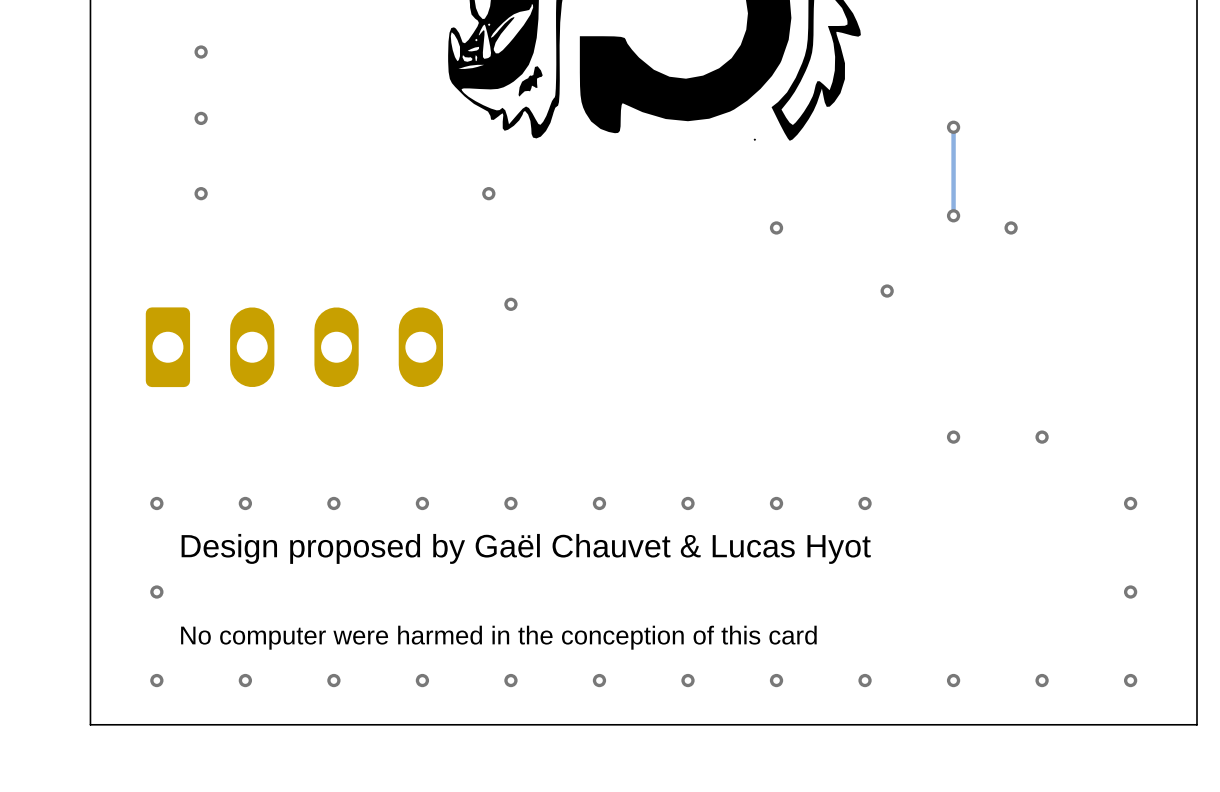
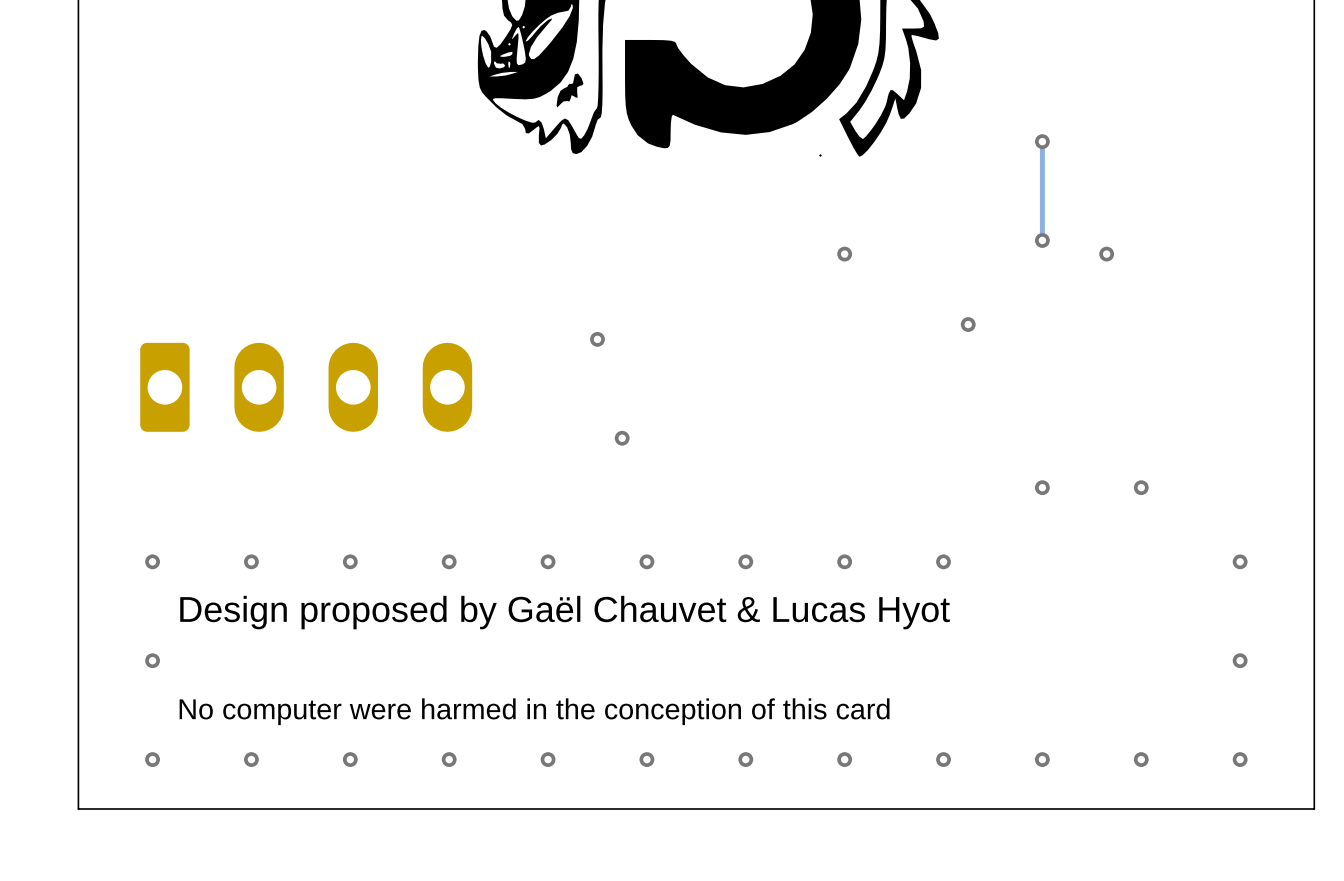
via: (201, 52) -> none
via: (201, 118) -> none
via: (201, 193) -> none
via: (488, 193) -> none
via position: (510, 304) -> (597, 339)
via: none -> (622, 438)

